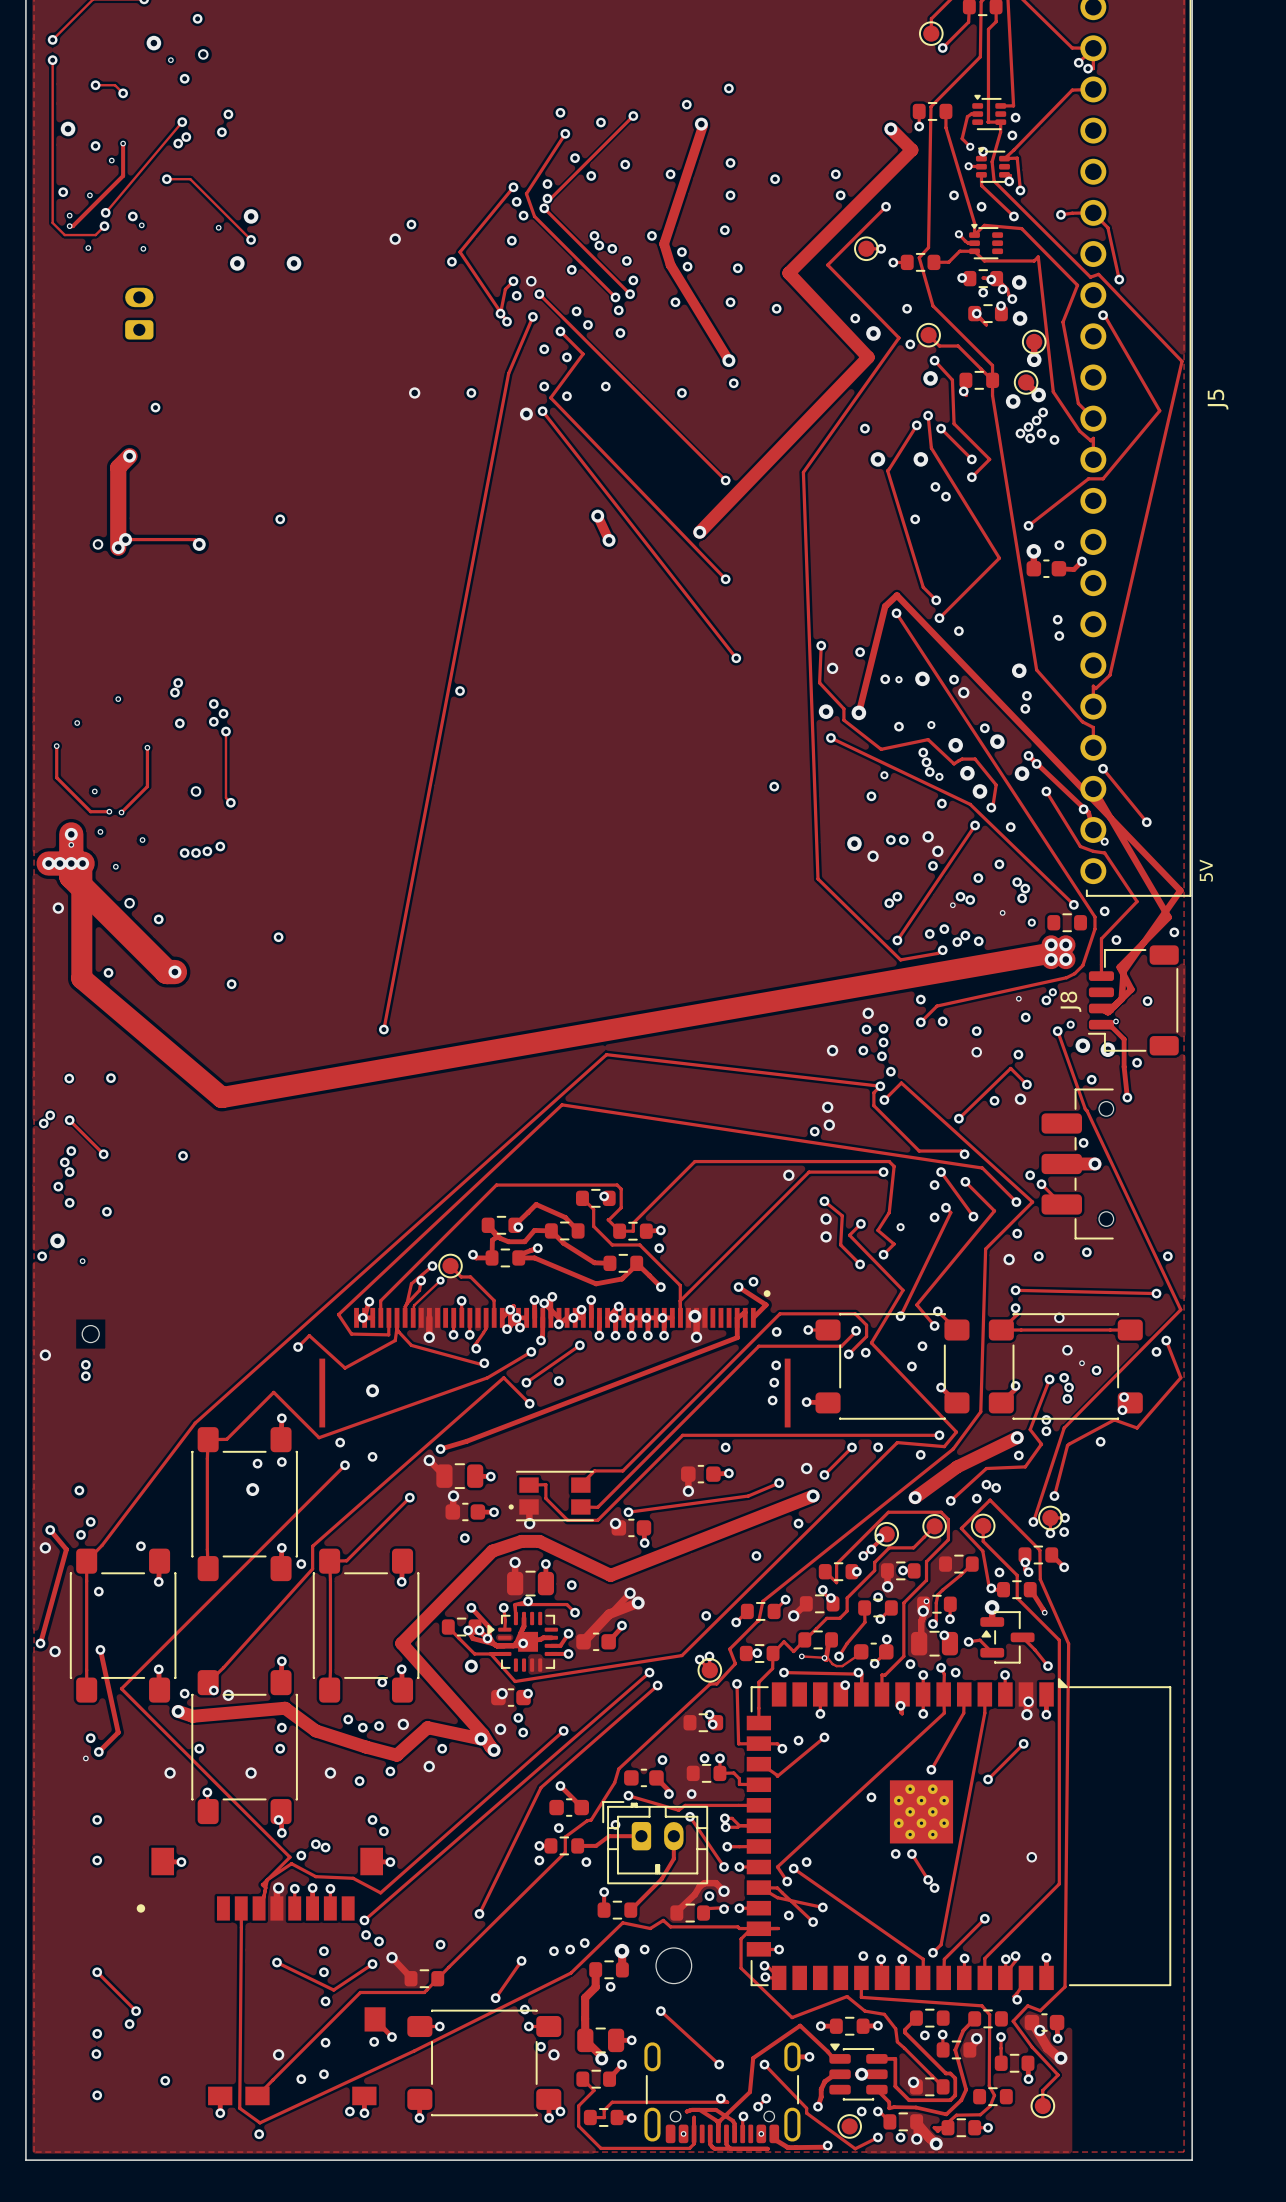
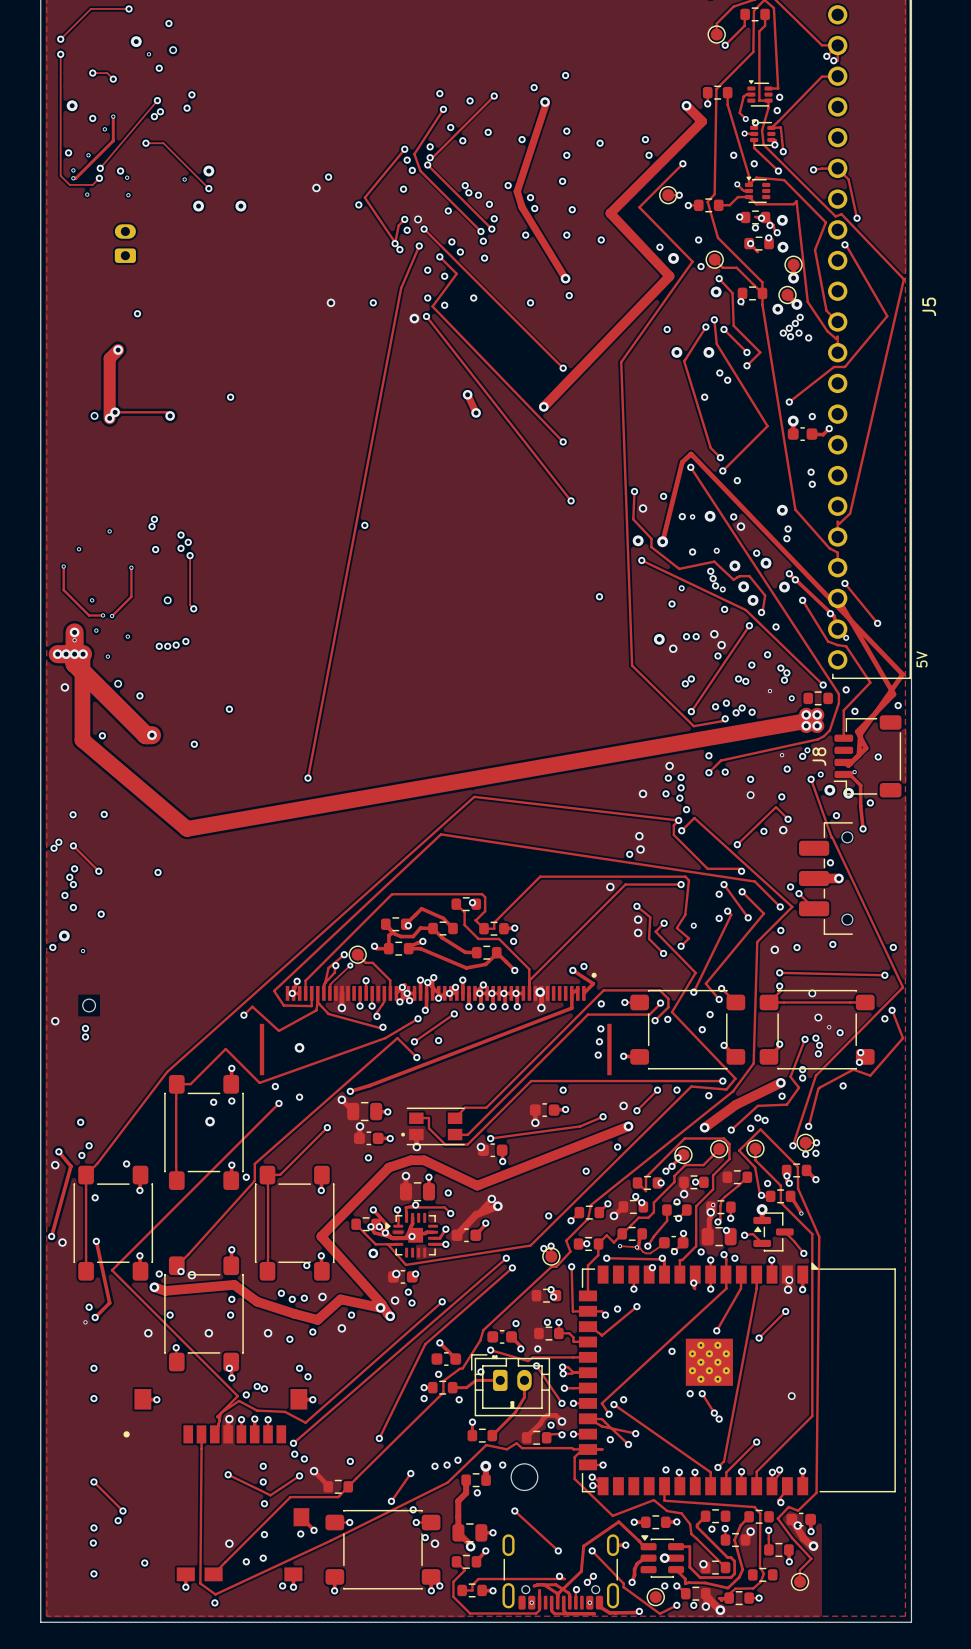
via: (952, 905) -> none

